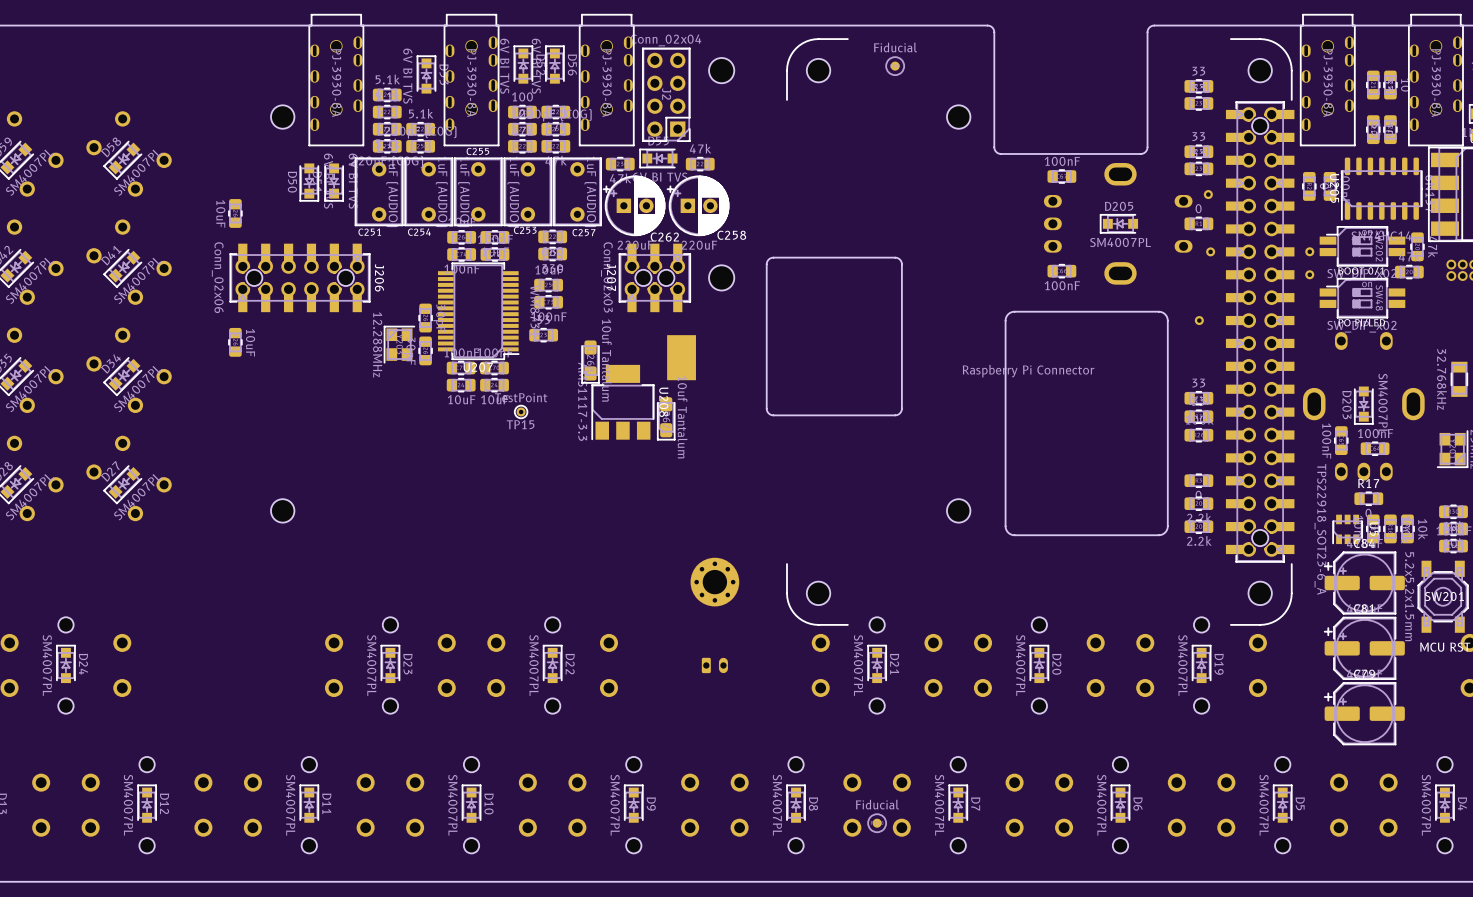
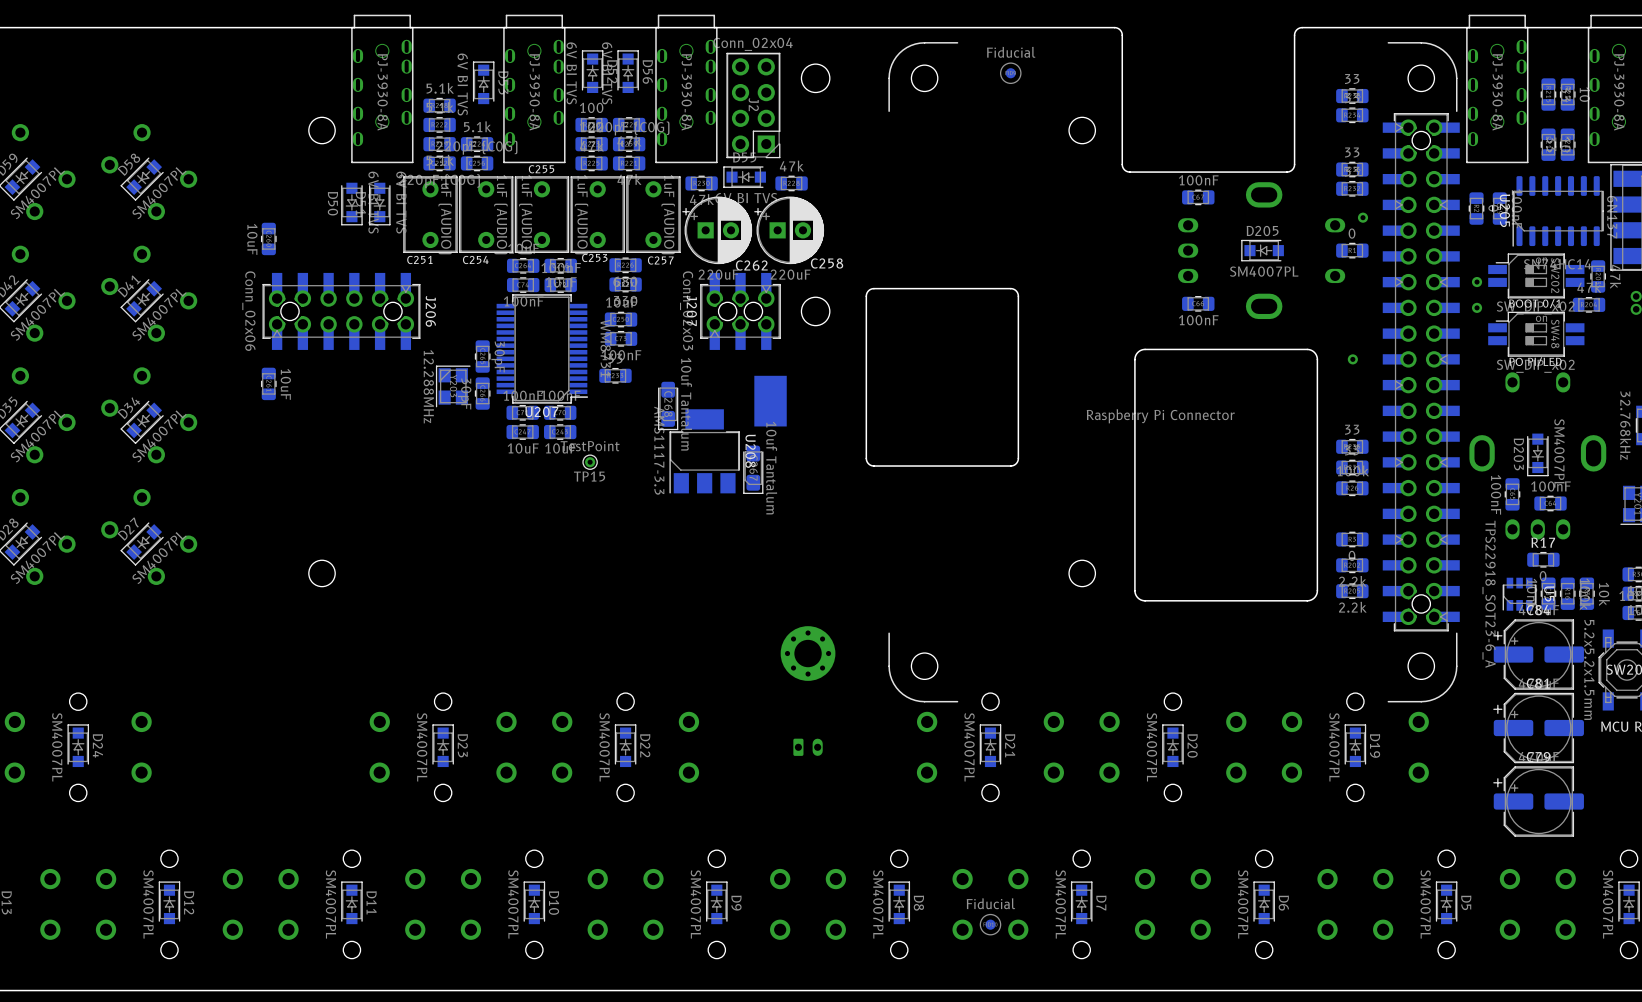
part: (1210, 251) -> none

